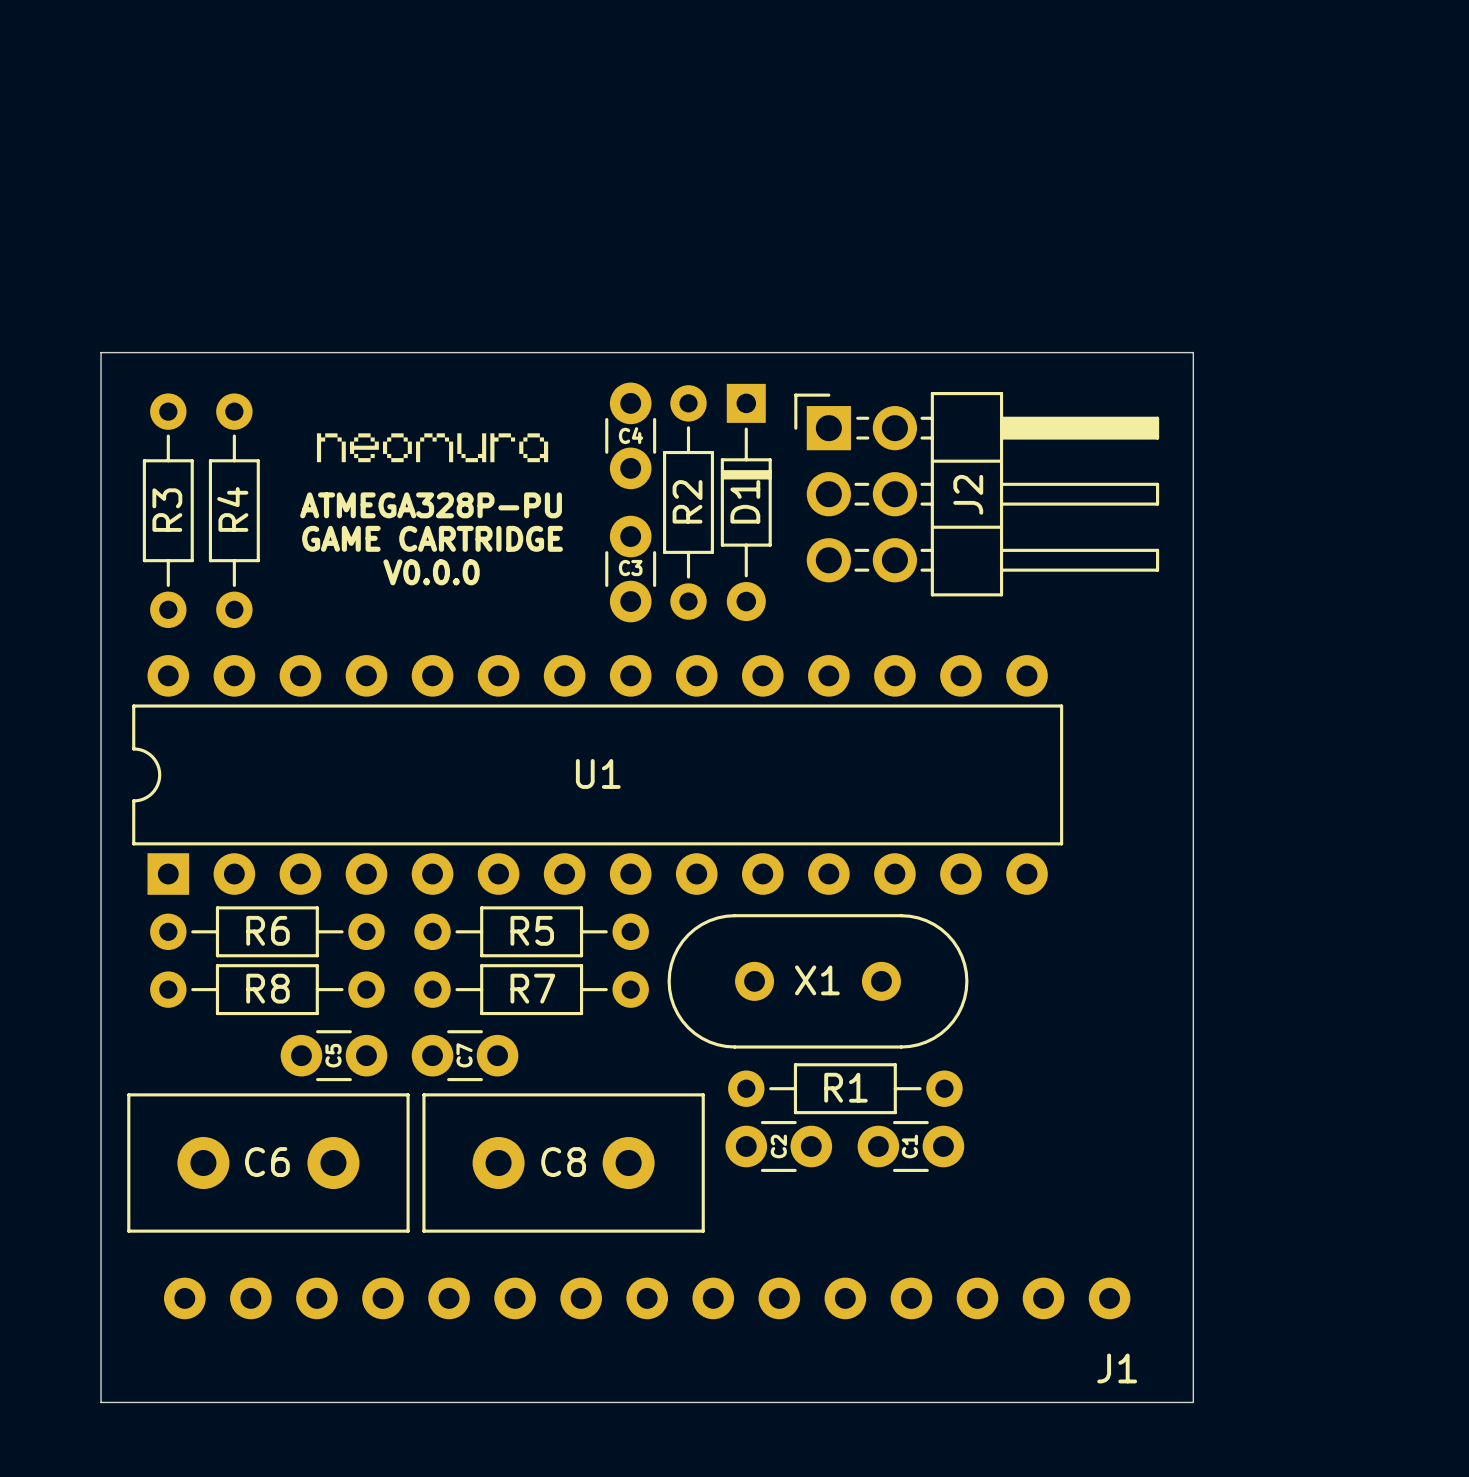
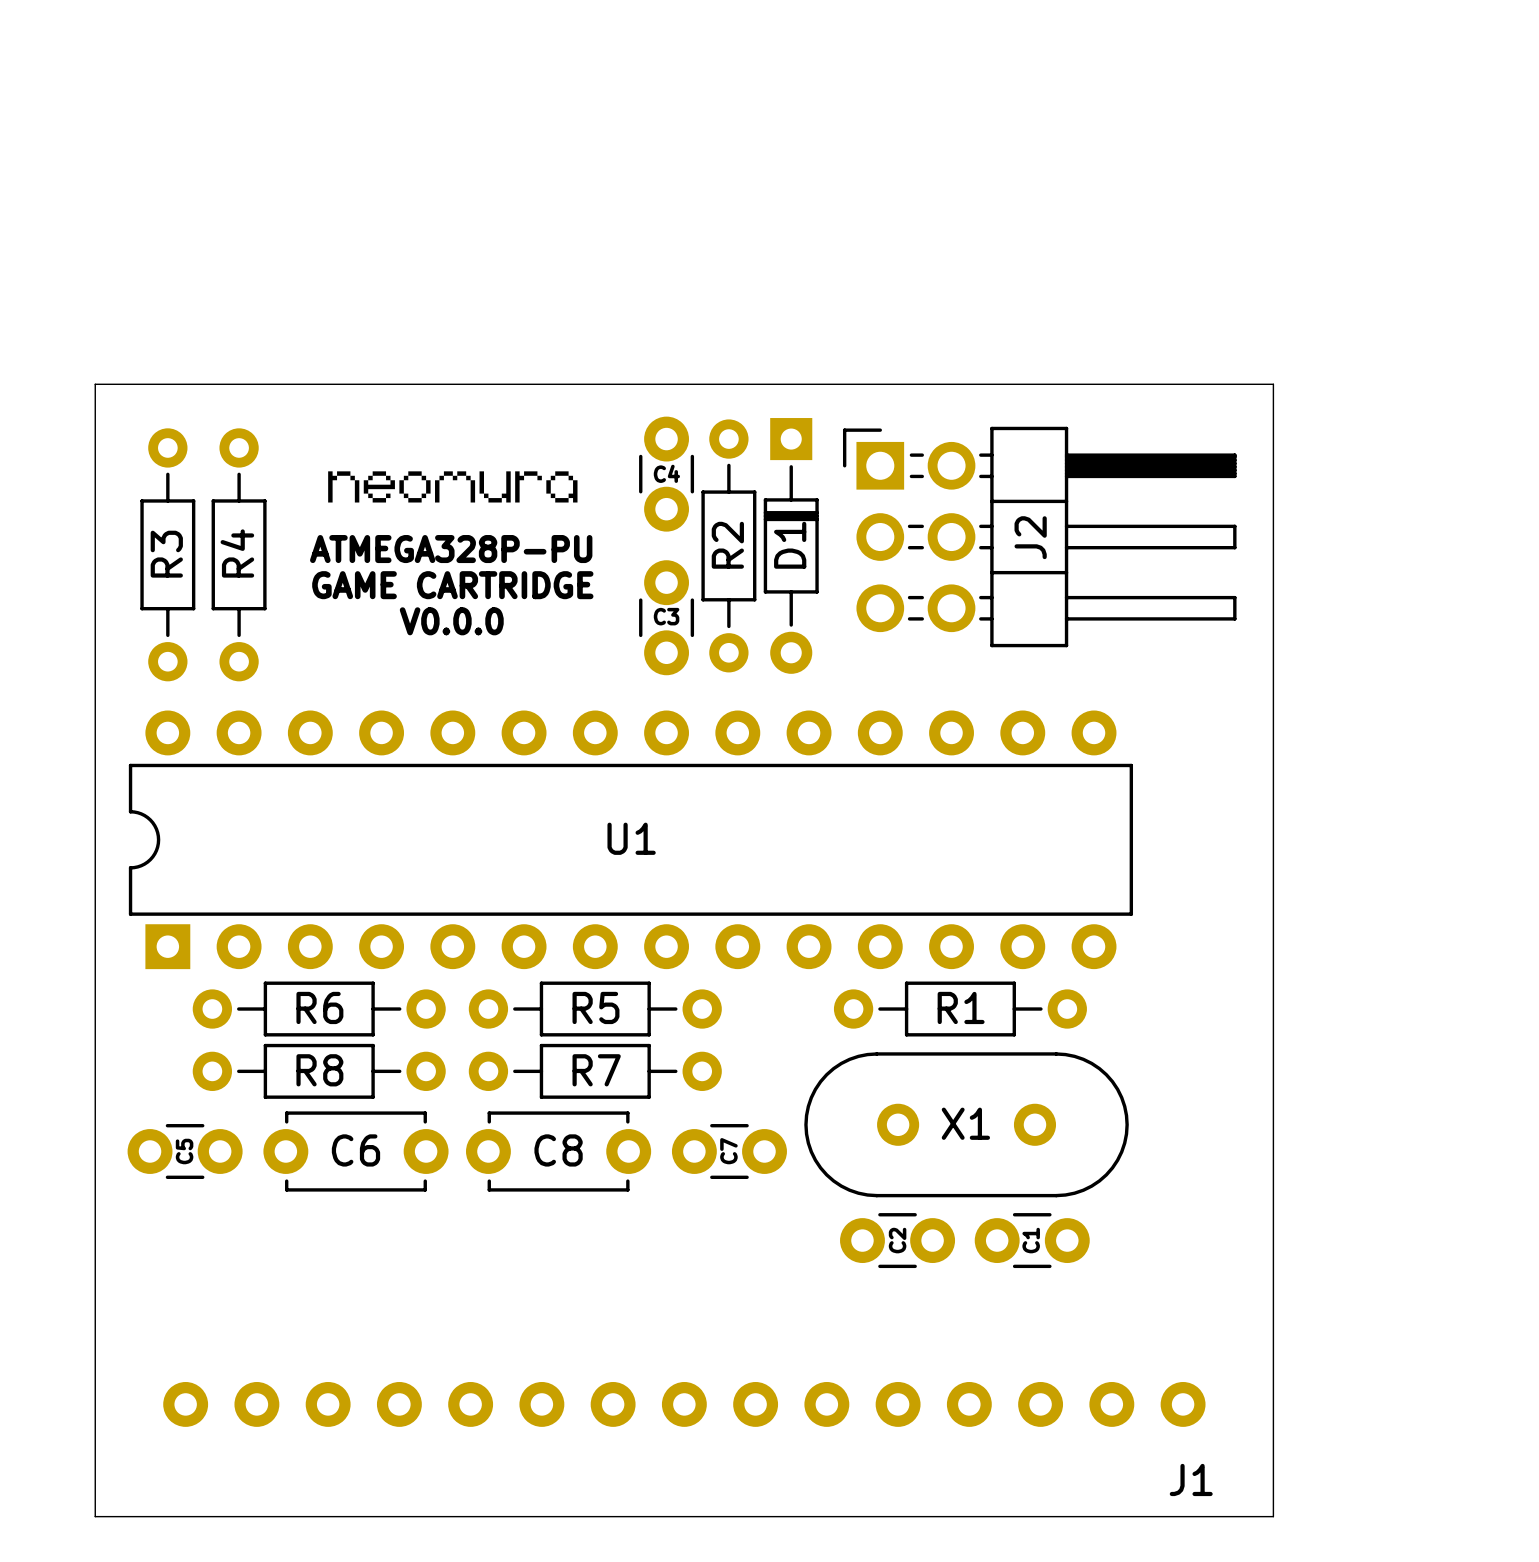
R6 position: (267, 931) -> (319, 1009)
R5 position: (531, 931) -> (595, 1009)
X1 position: (818, 981) -> (966, 1124)
R8 position: (267, 989) -> (319, 1071)
R7 position: (531, 989) -> (595, 1071)
C5 position: (333, 1055) -> (185, 1151)
C7 position: (465, 1055) -> (729, 1151)
R1 position: (845, 1088) -> (960, 1009)
C6 footprint: [127, 1093, 410, 1233] -> [263, 1111, 449, 1192]
C8 footprint: [422, 1093, 705, 1233] -> [466, 1111, 652, 1192]
C2 position: (778, 1146) -> (897, 1240)
C1 position: (910, 1146) -> (1032, 1240)

